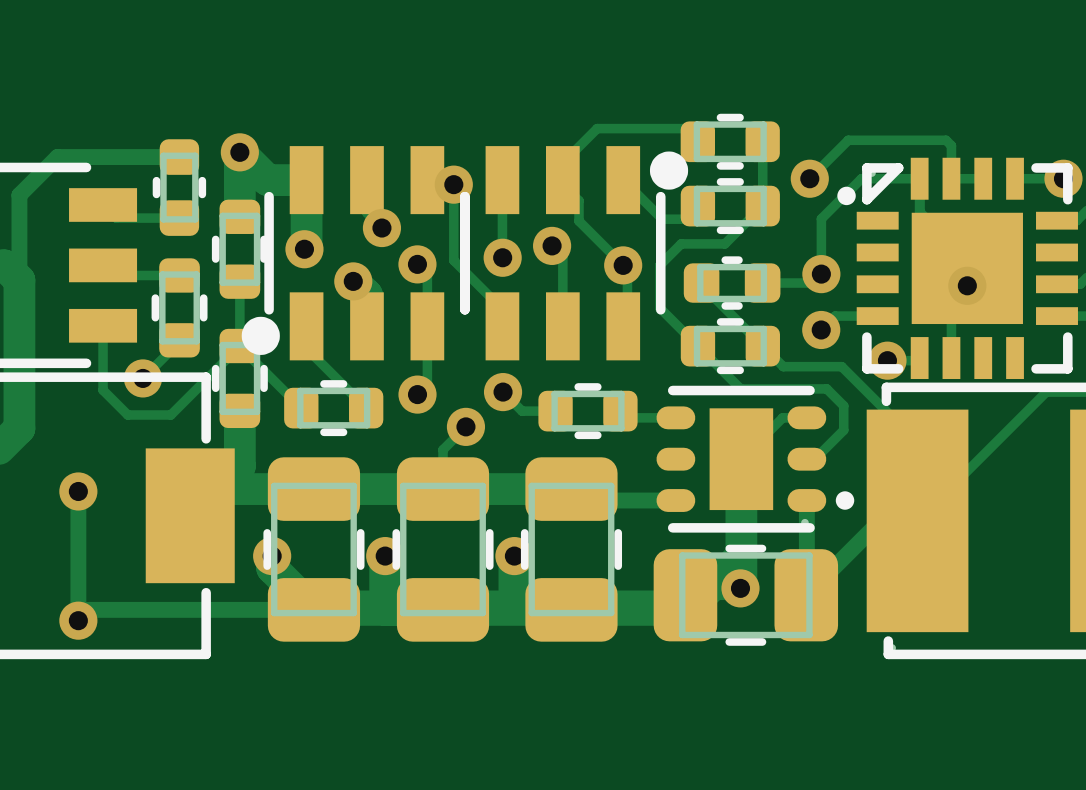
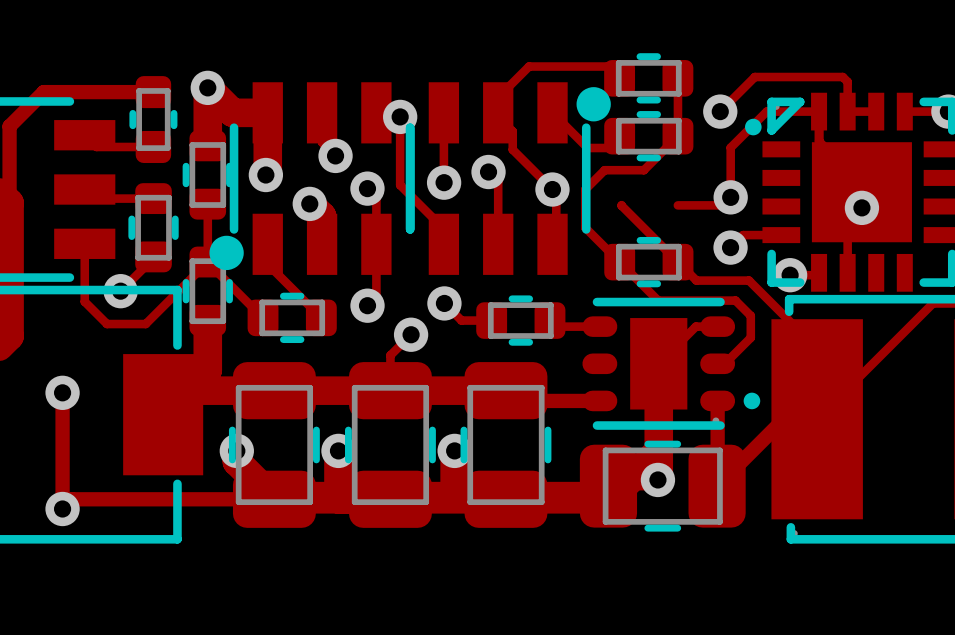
part: (732, 283) -> none

